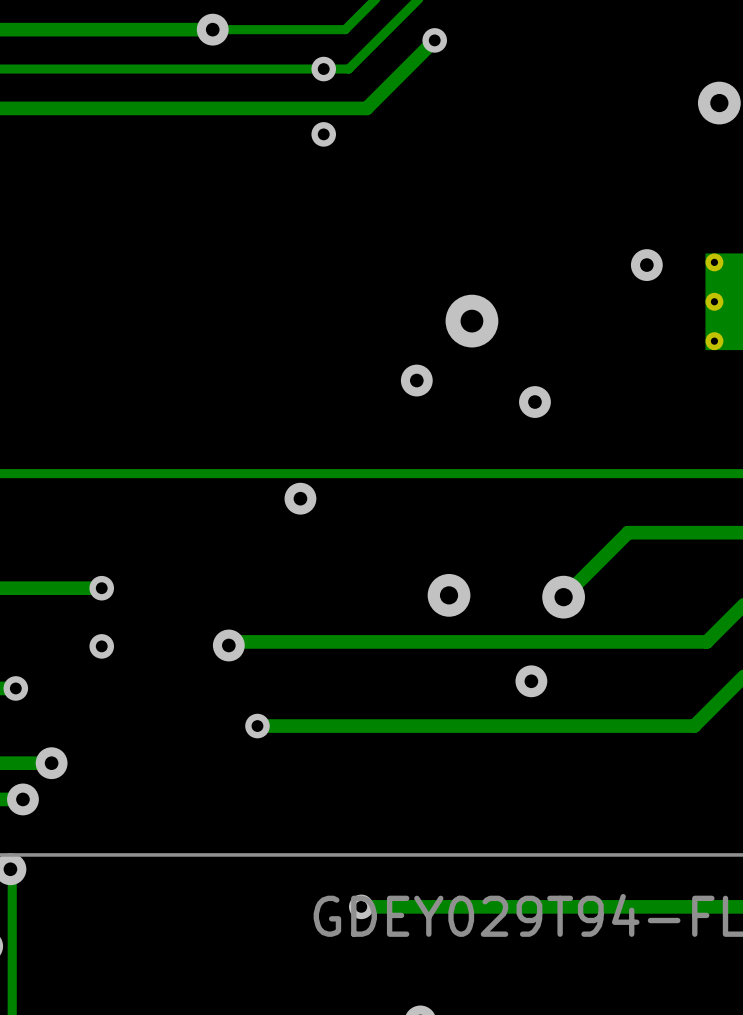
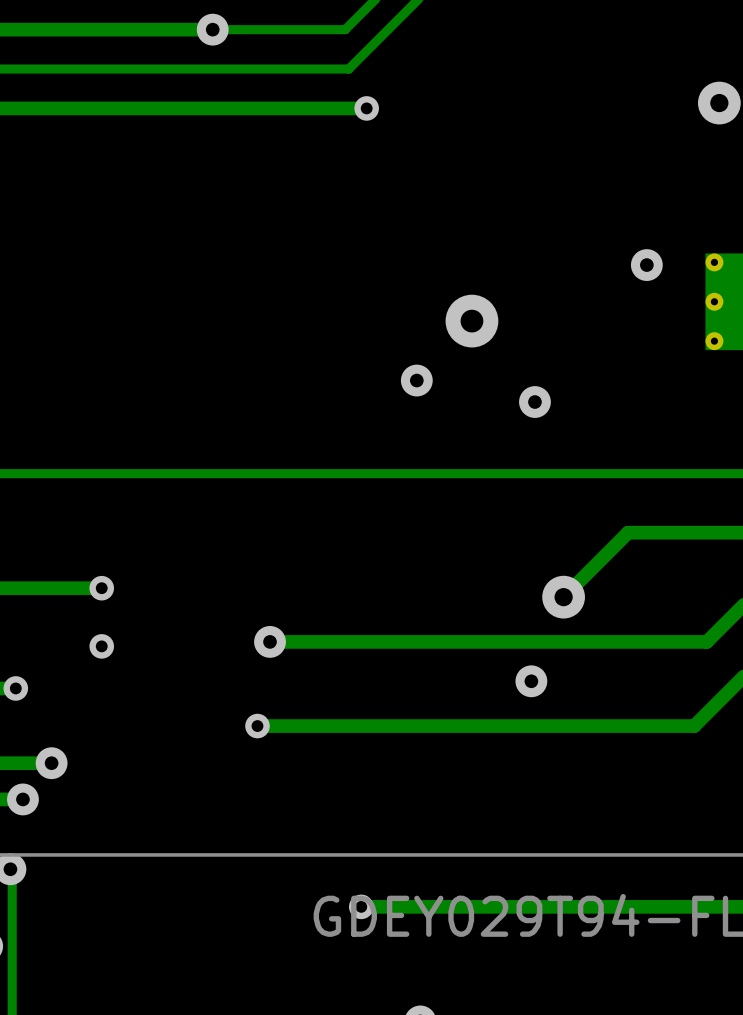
track: (434, 40) (366, 108) -> none
via: (434, 40) -> none
via: (323, 69) -> none
via: none -> (366, 108)
via: (323, 134) -> none
via: (300, 498) -> none
via: (449, 595) -> none
track: (270, 641) (232, 641) (228, 645) -> none
via position: (228, 645) -> (270, 641)

